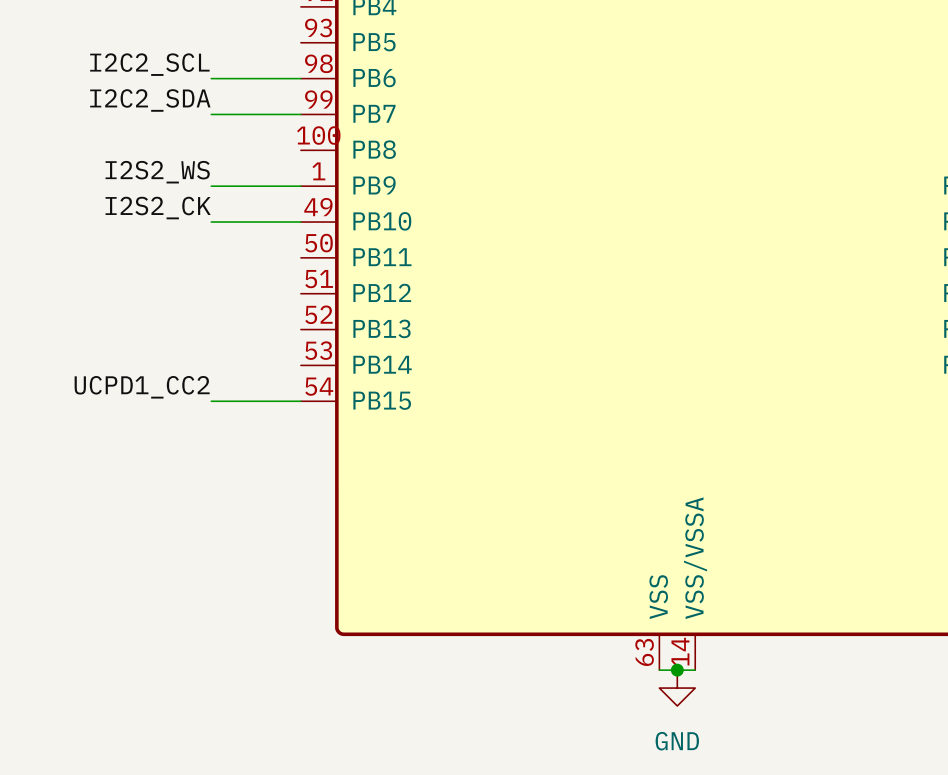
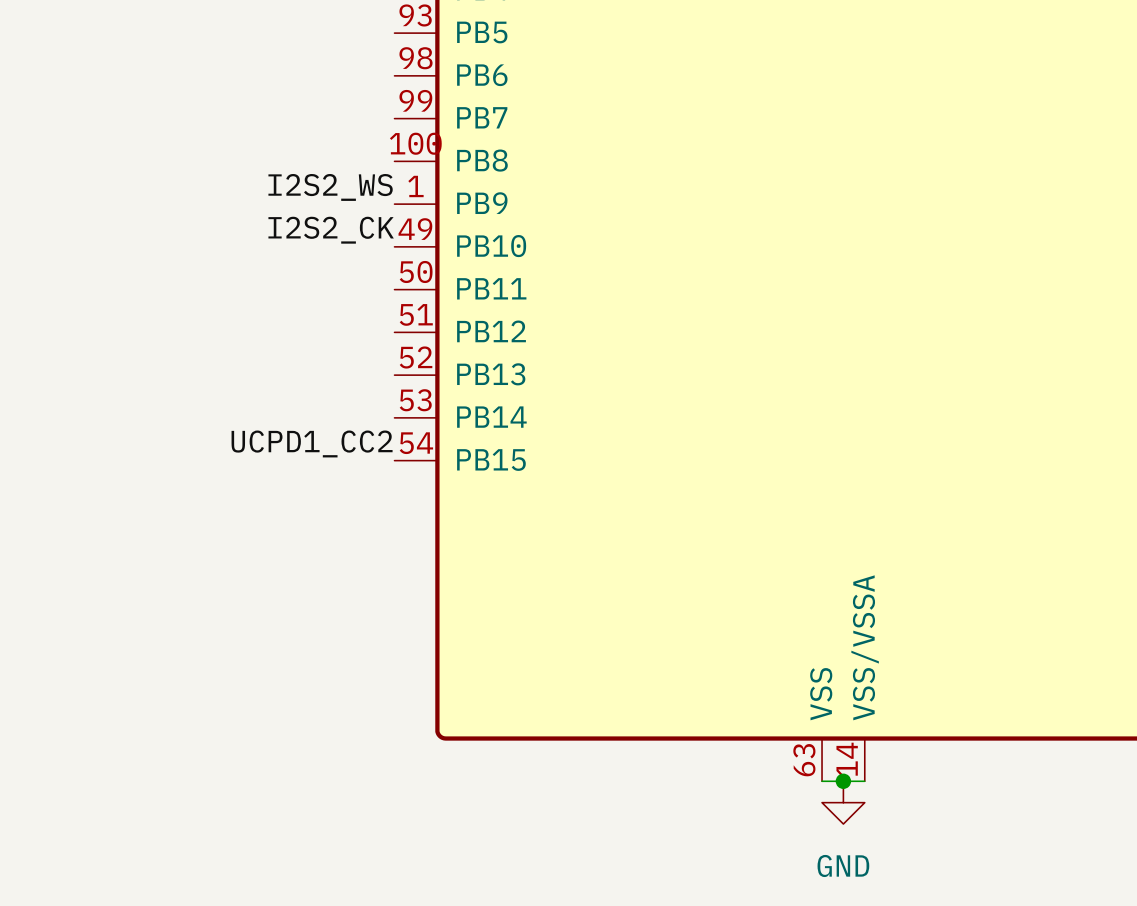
label: I2C2_SCL (149, 64) -> none
wire: (211, 78) (300, 78) -> none
label: I2C2_SDA (150, 100) -> none
wire: (211, 114) (300, 114) -> none
label position: I2S2_WS (157, 172) -> I2S2_WS (330, 187)
wire: (211, 186) (300, 186) -> none
label position: I2S2_CK (158, 208) -> I2S2_CK (331, 230)
wire: (211, 222) (300, 222) -> none
label position: UCPD1_CC2 (142, 387) -> UCPD1_CC2 (312, 443)
wire: (211, 401) (300, 401) -> none

